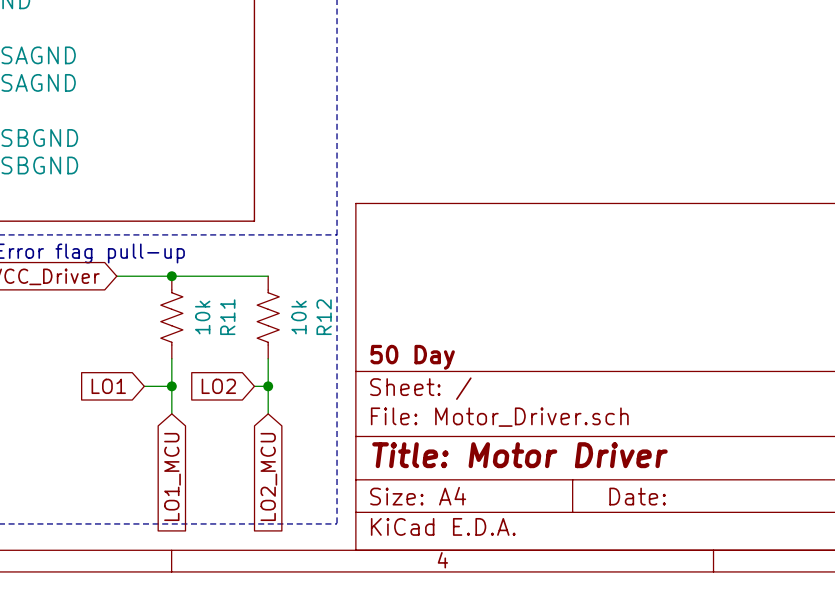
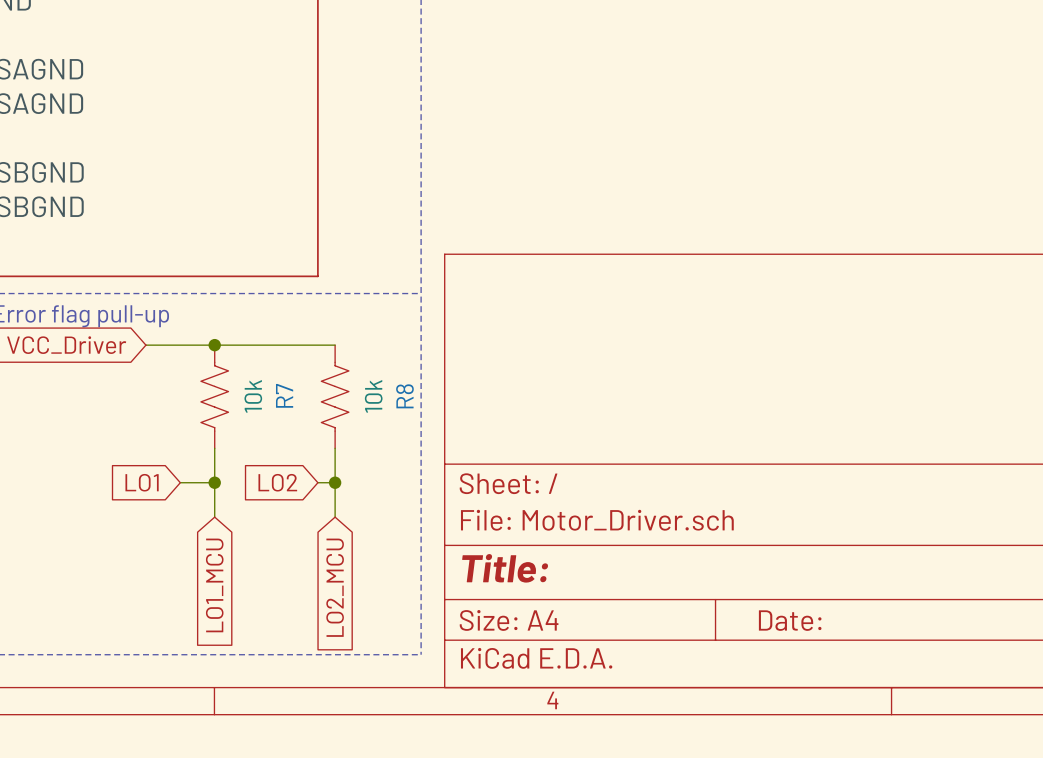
R11 name: R11 (227, 317) -> R7 (284, 395)
R12 name: R12 (324, 317) -> R8 (404, 396)
title block: 50 Day (412, 357) -> none
title block: Title: Motor Driver (519, 455) -> Title: (505, 568)

